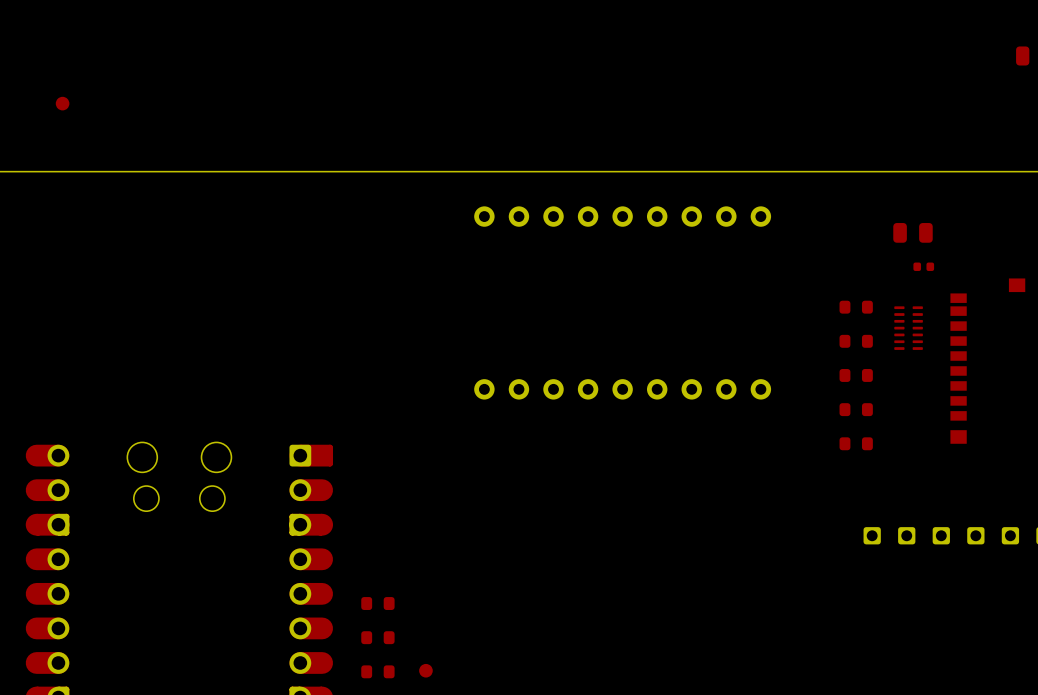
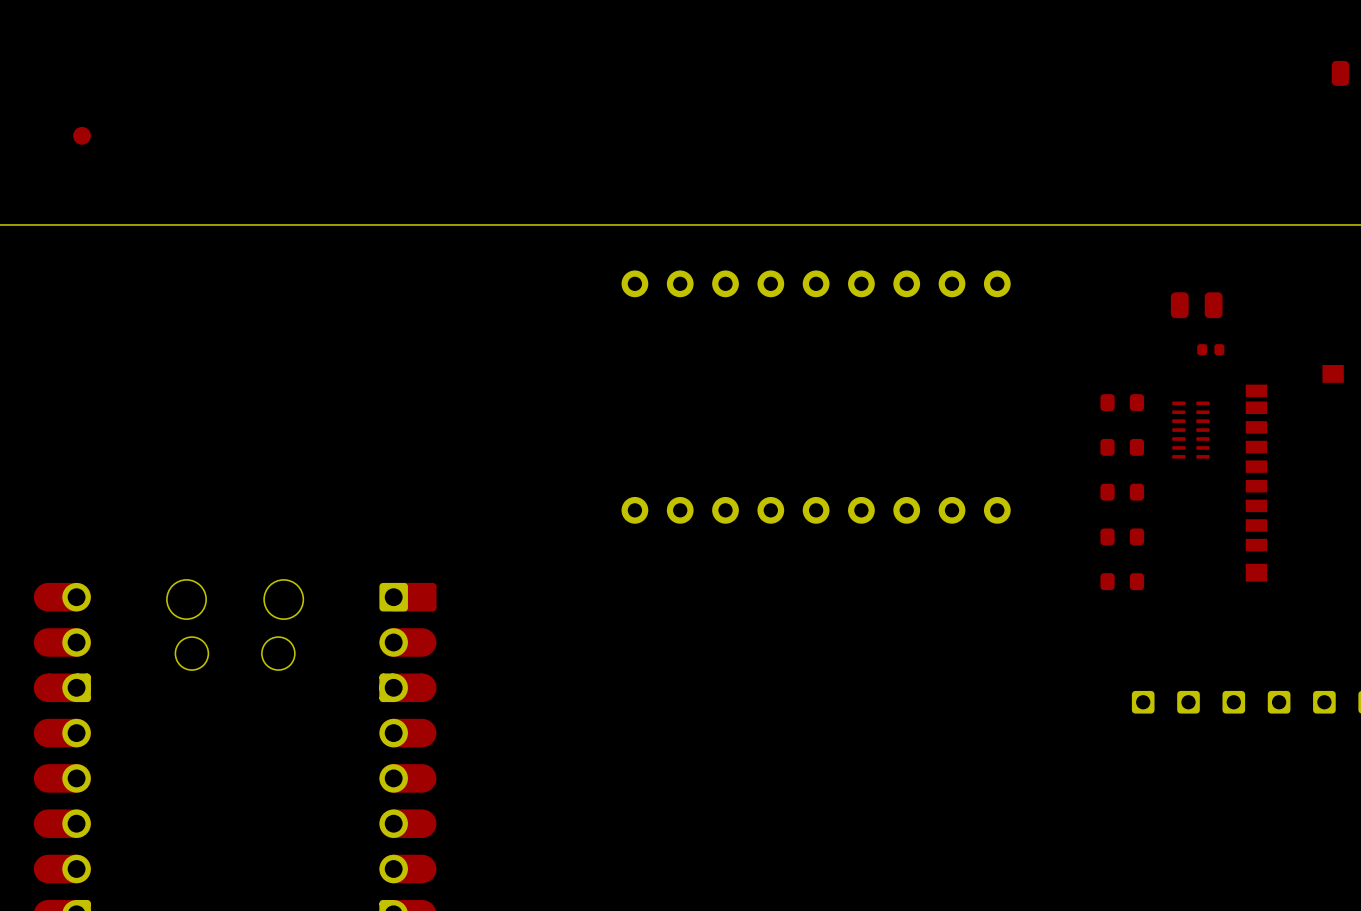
part: (377, 603) -> none
part: (377, 637) -> none
part: (425, 670) -> none
part: (377, 671) -> none

